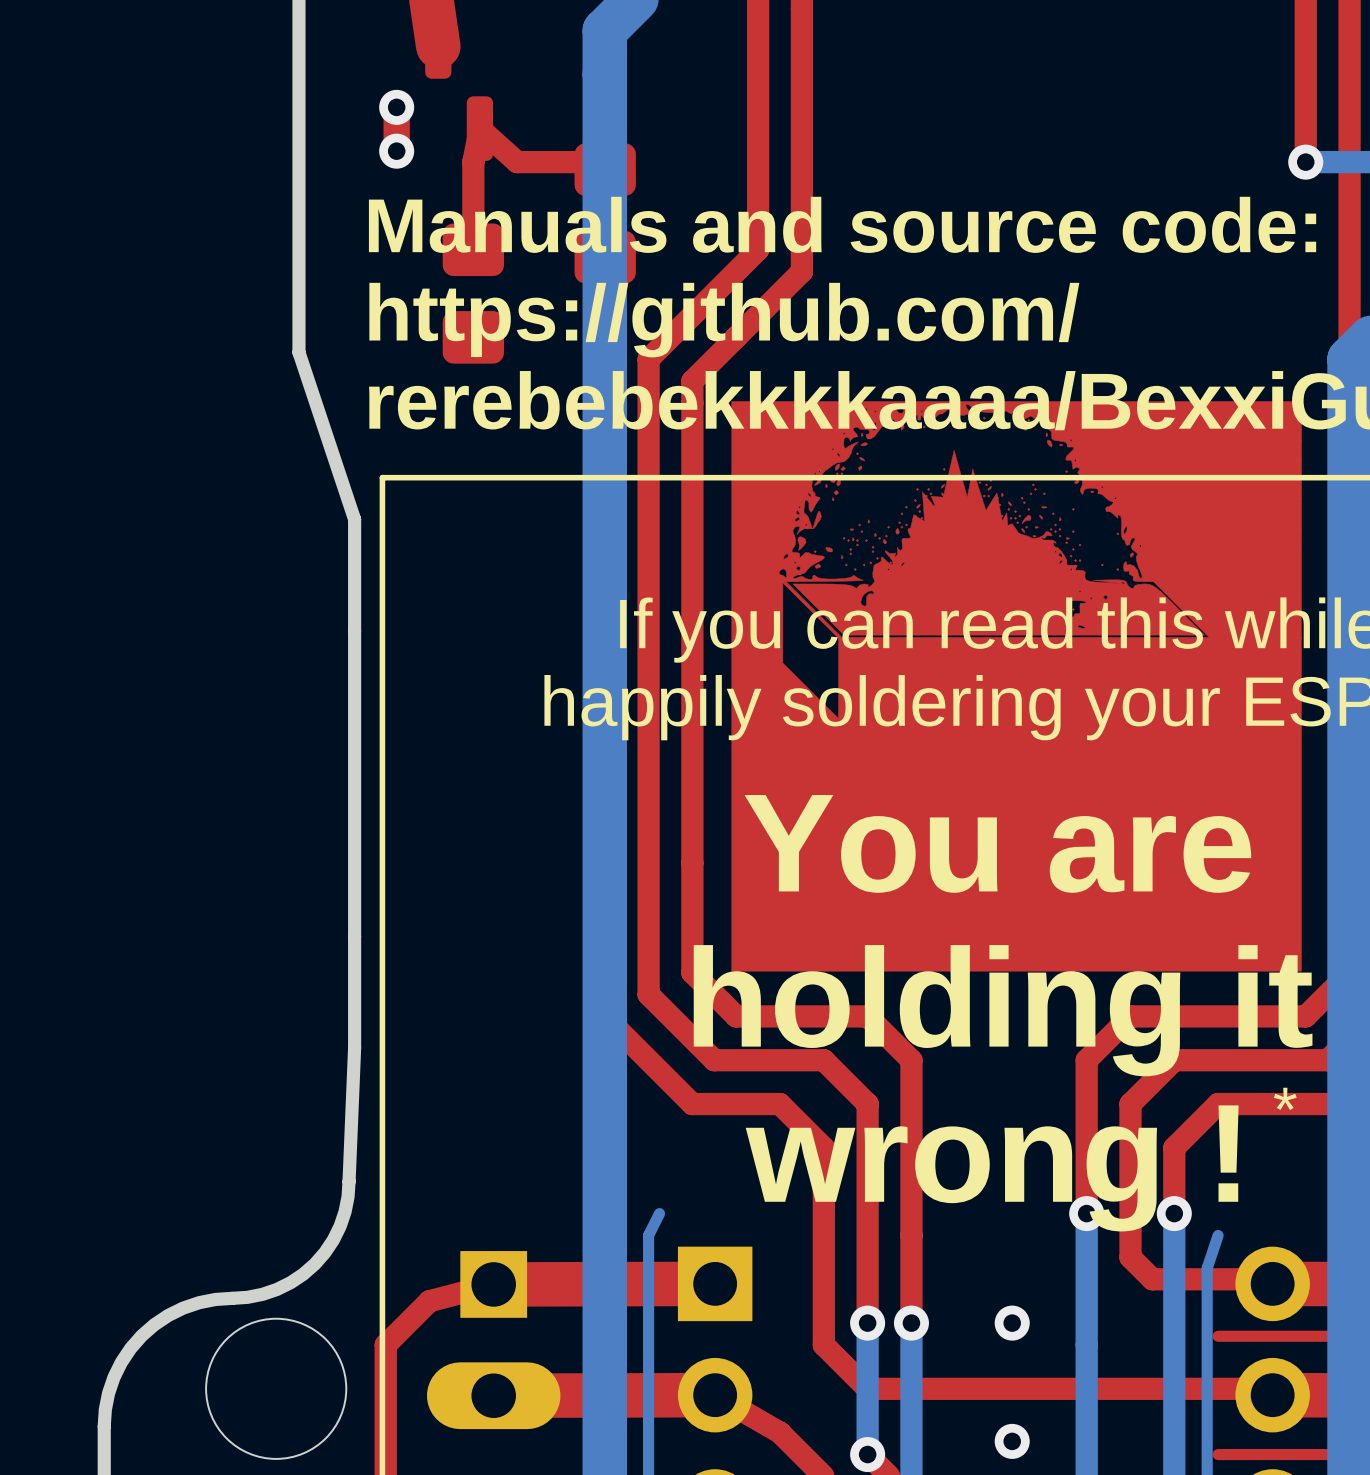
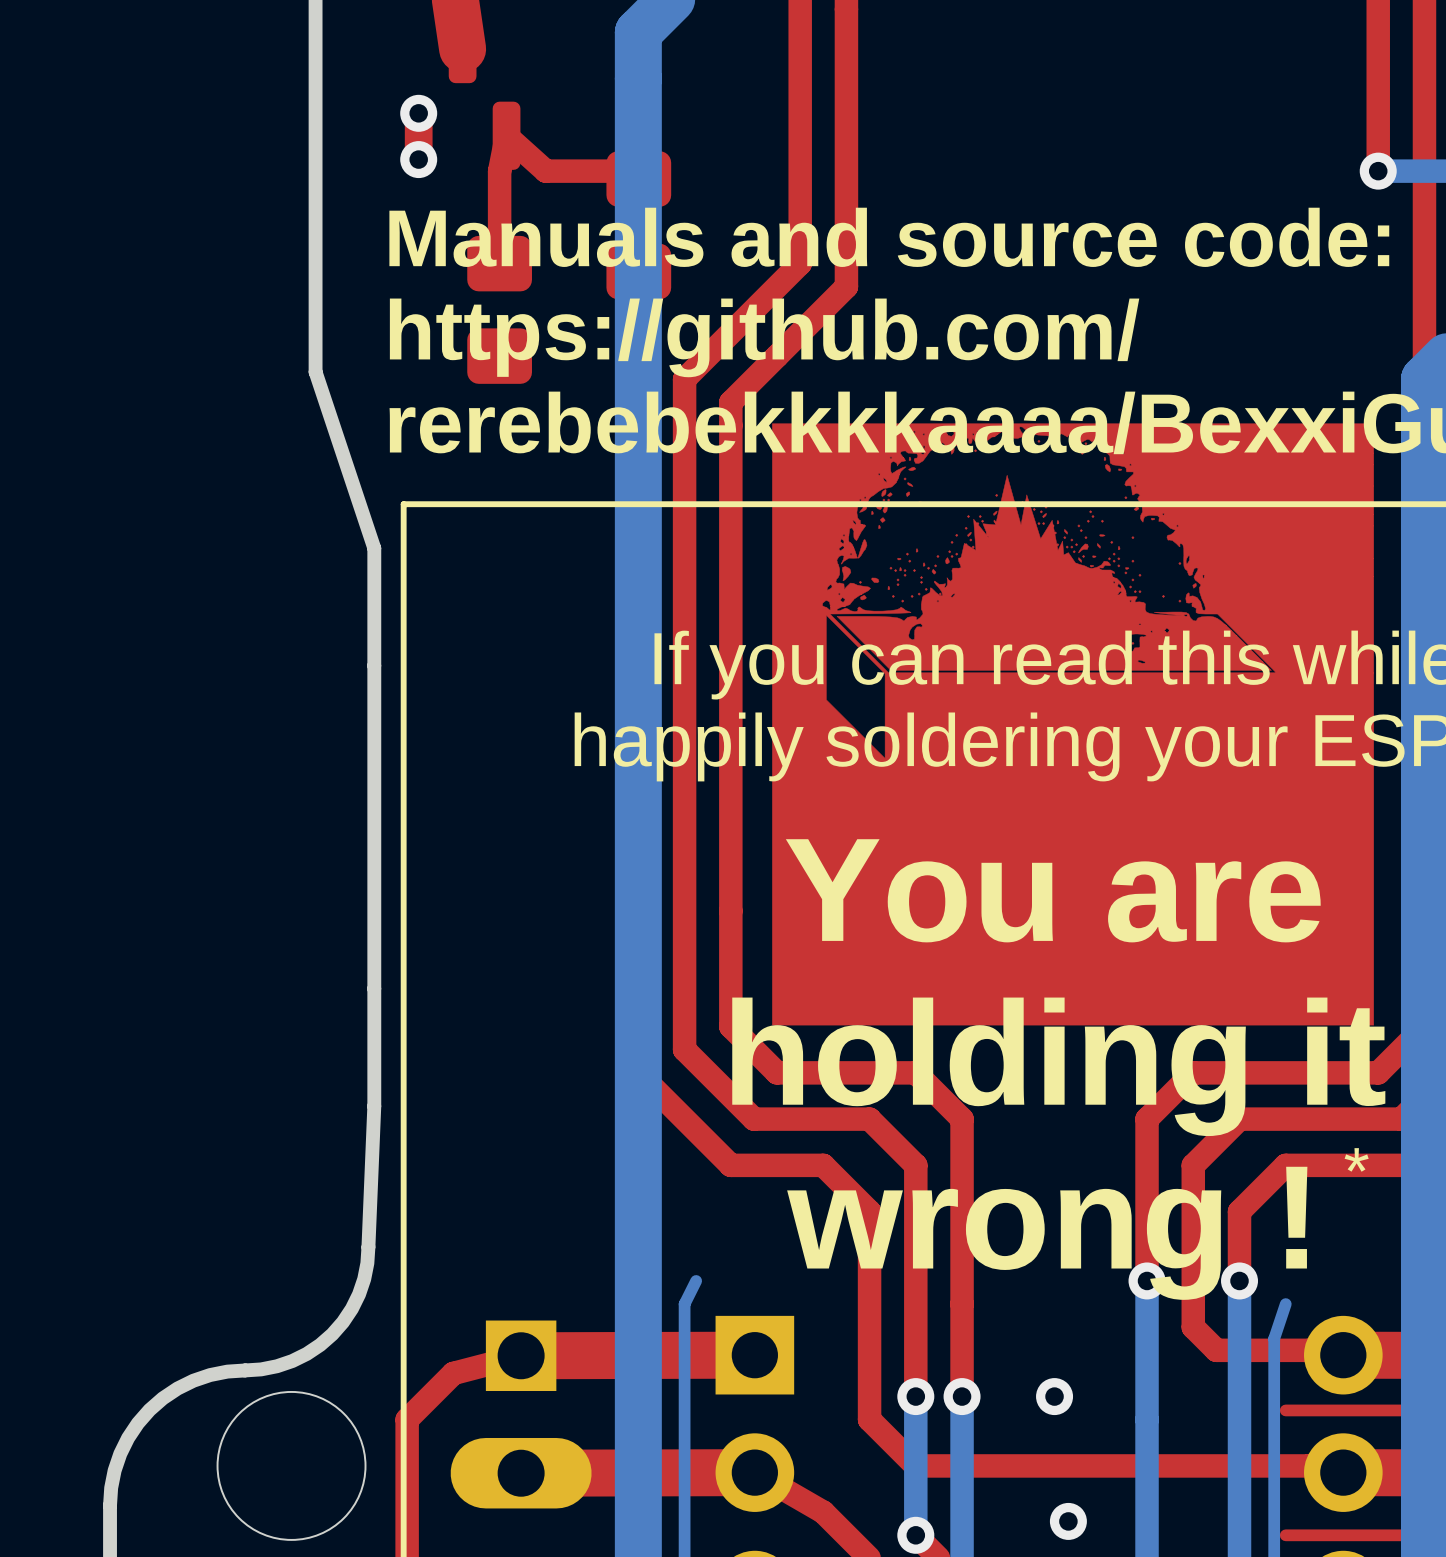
via position: (1012, 1323) -> (1054, 1396)

